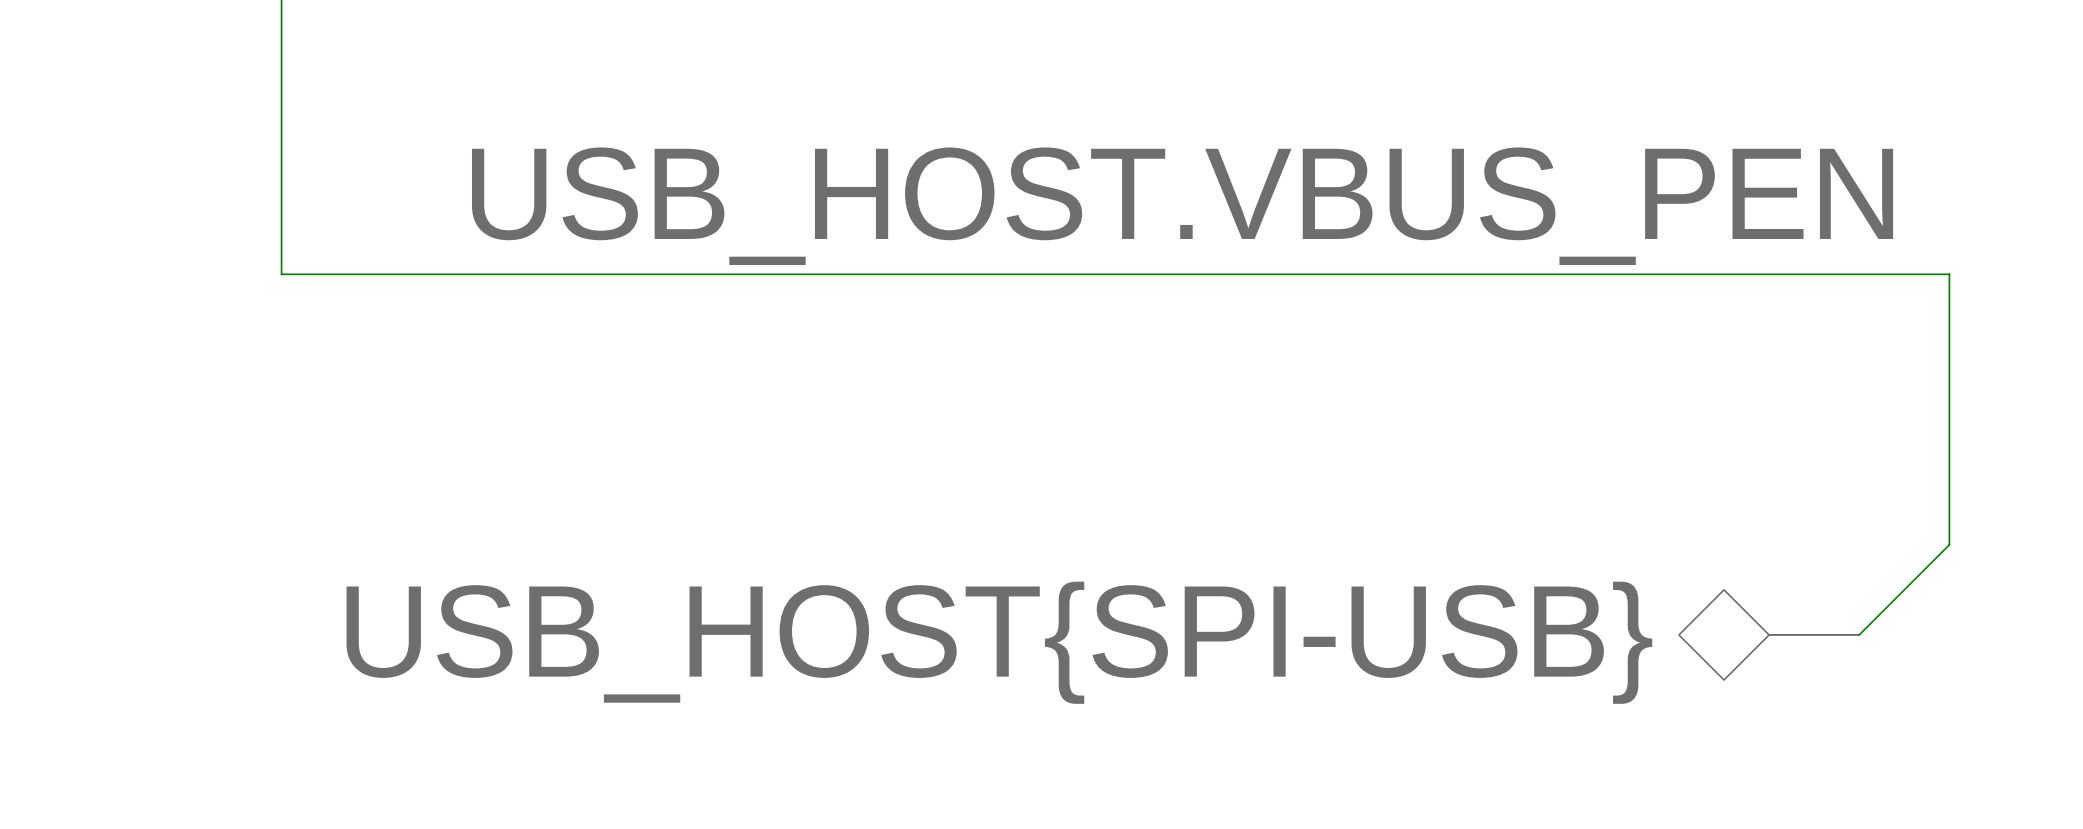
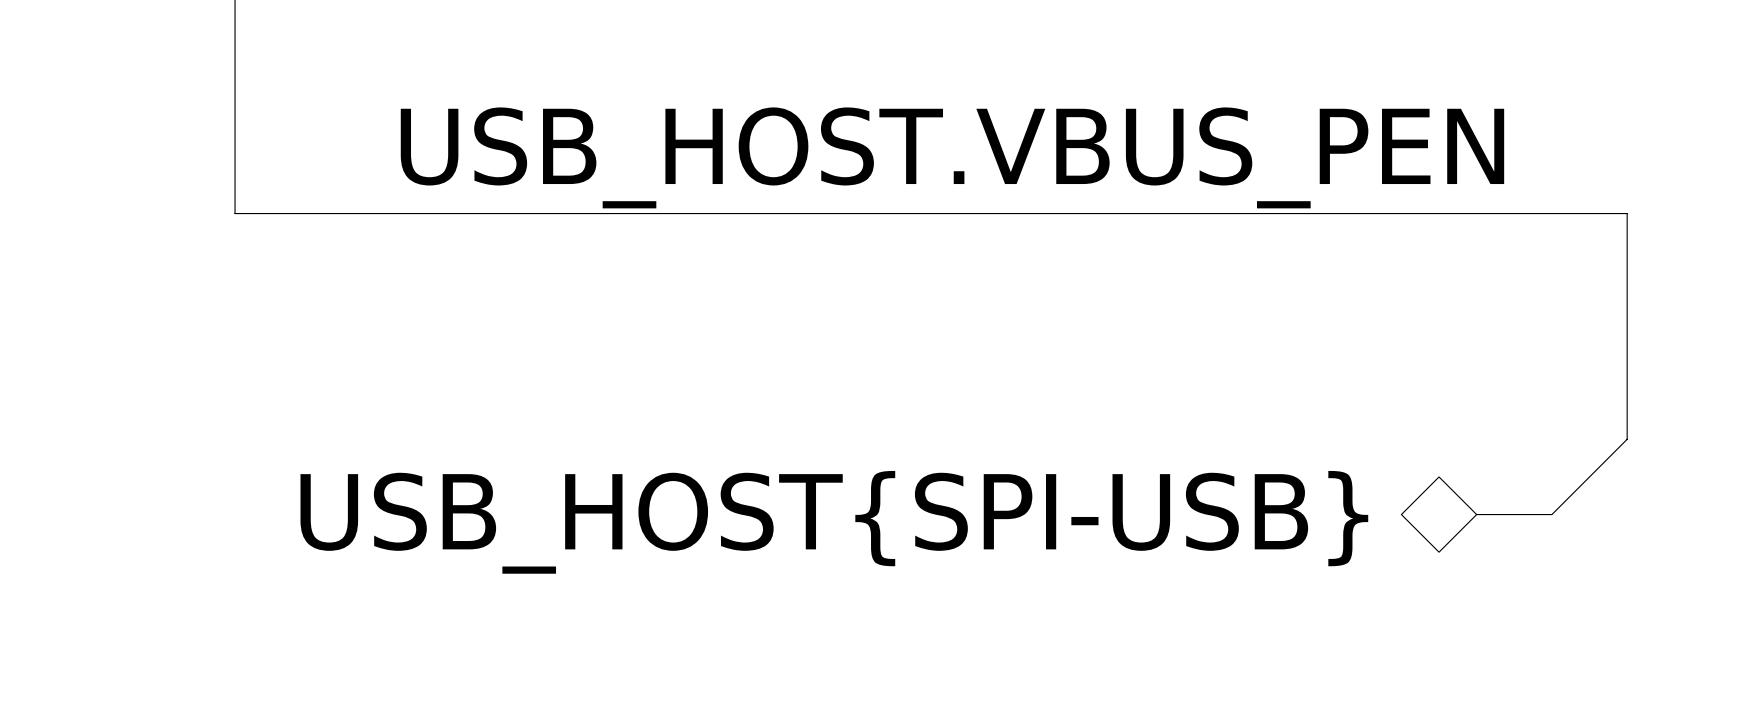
label position: USB_HOST.VBUS_PEN (1182, 206) -> USB_HOST.VBUS_PEN (952, 157)

